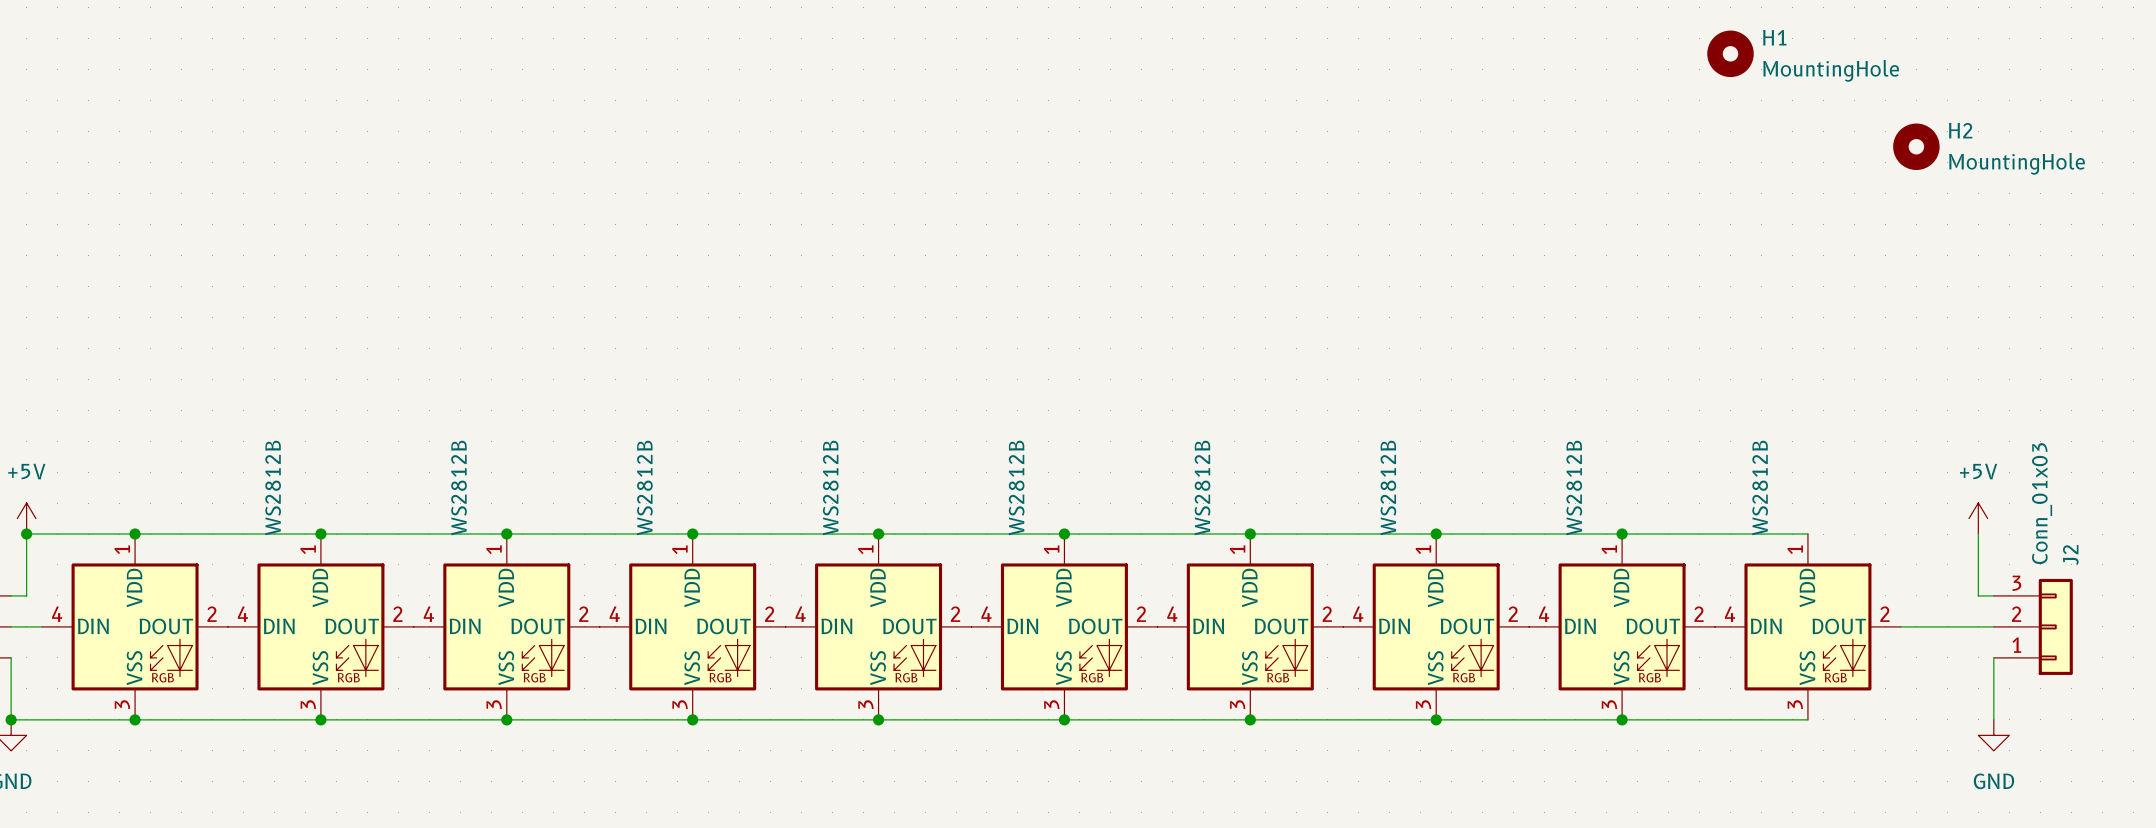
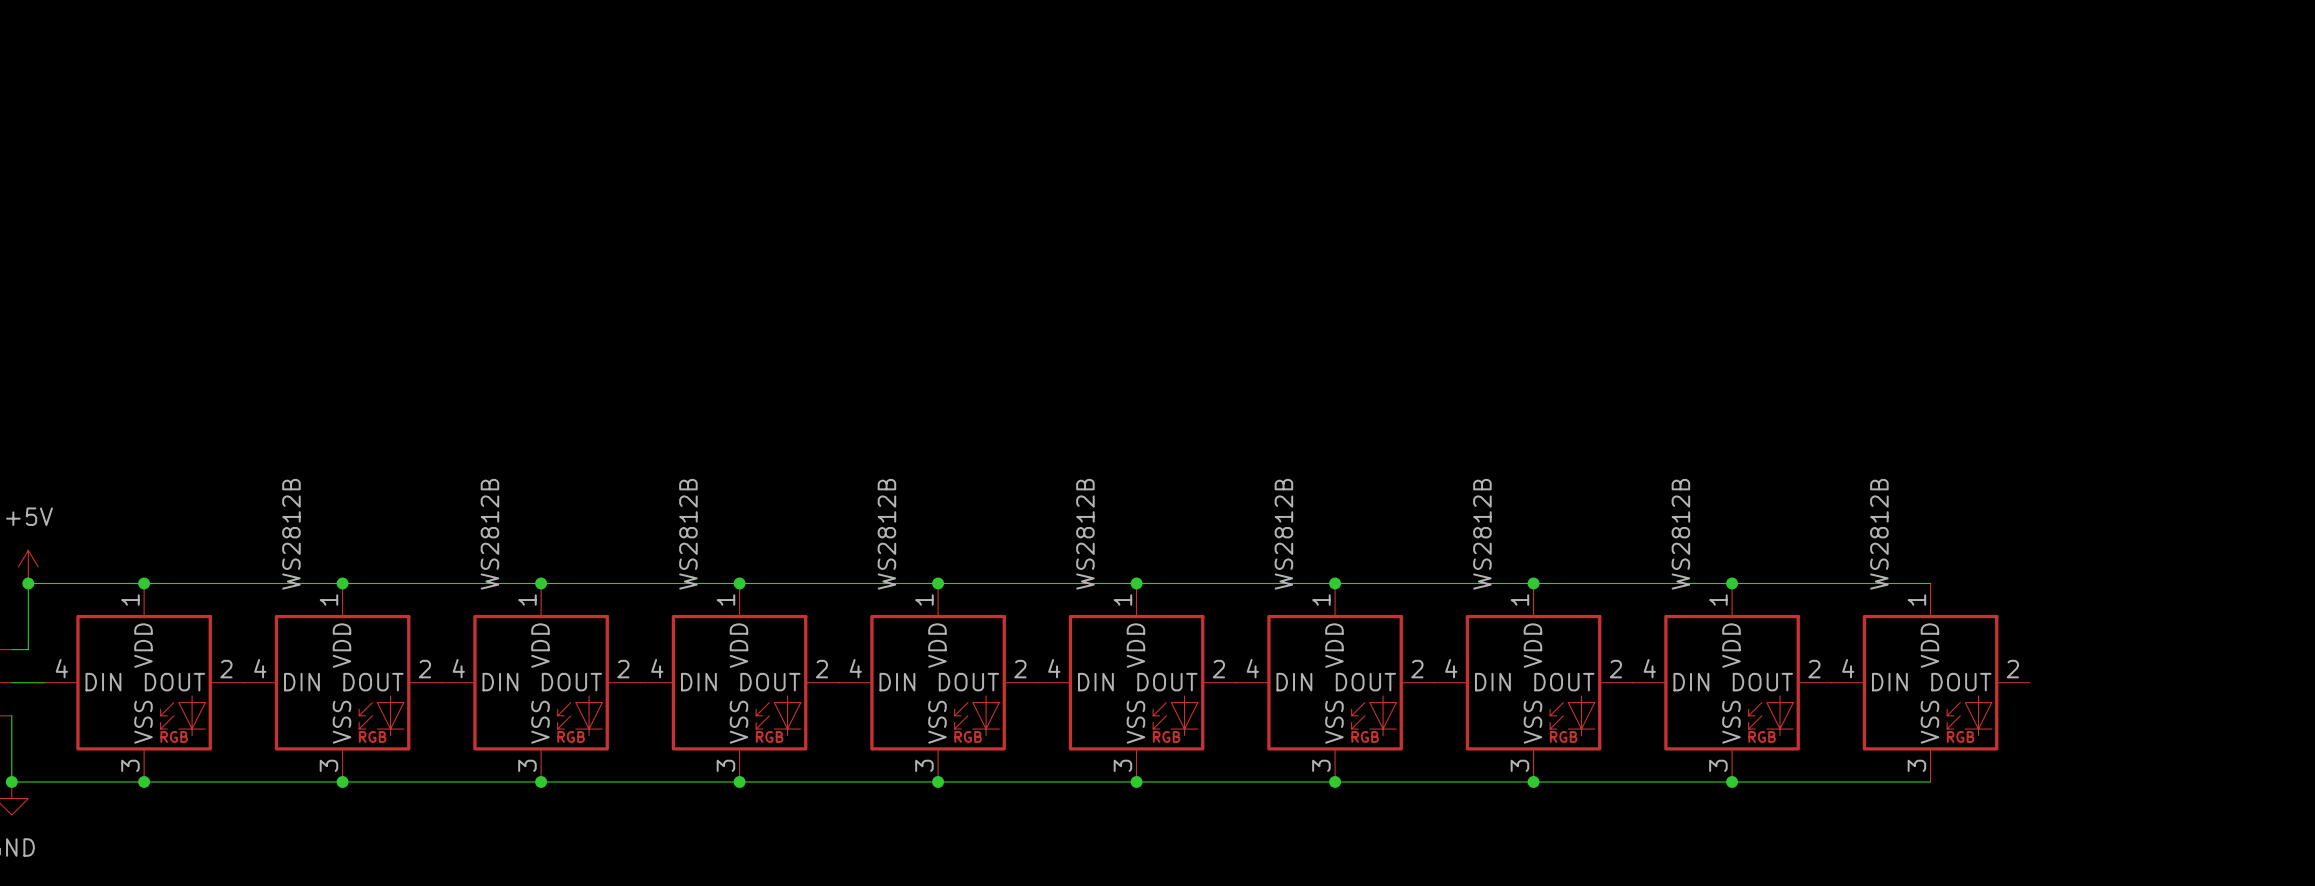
H1: MountingHole (1730, 53) -> none
H2: MountingHole (1916, 146) -> none
power symbol: +5V (1978, 518) -> none
wire: (1978, 534) (1978, 595) (1993, 595) -> none
wire: (1900, 626) (1993, 626) -> none
J2: Conn_01x03 (2033, 626) -> none
wire: (1993, 657) (1993, 719) -> none
power symbol: GND (1993, 735) -> none

